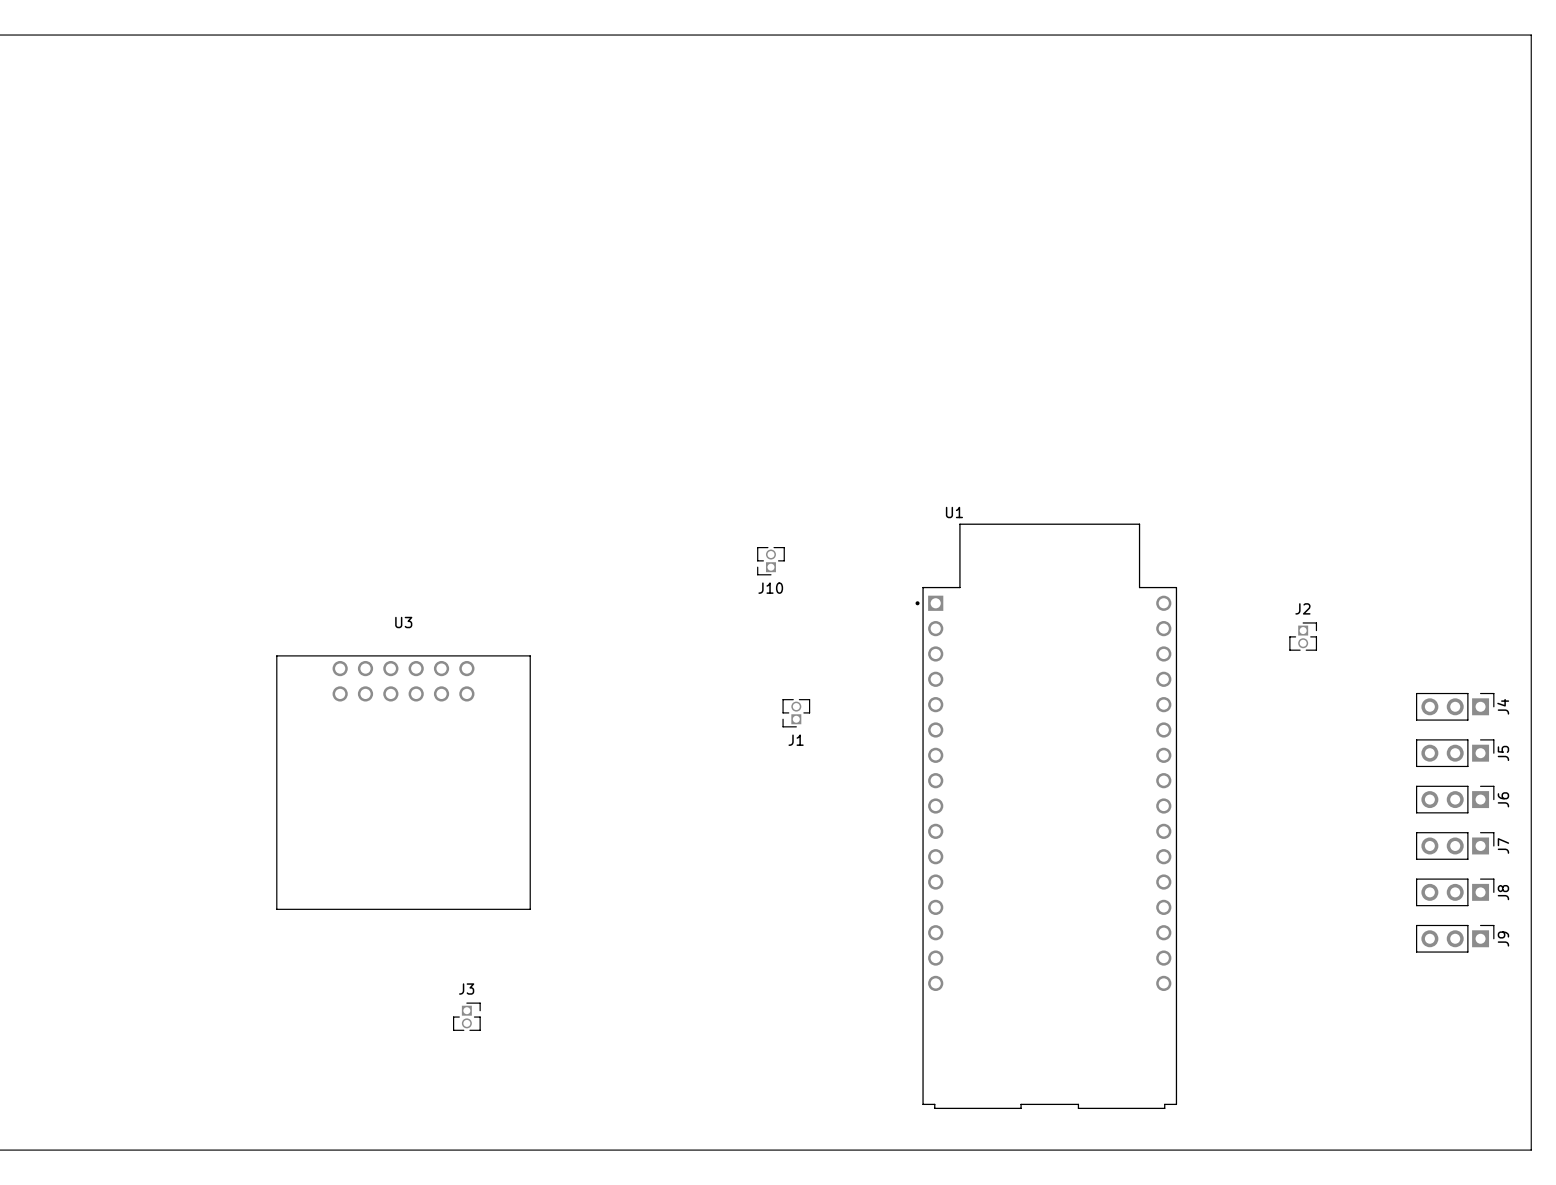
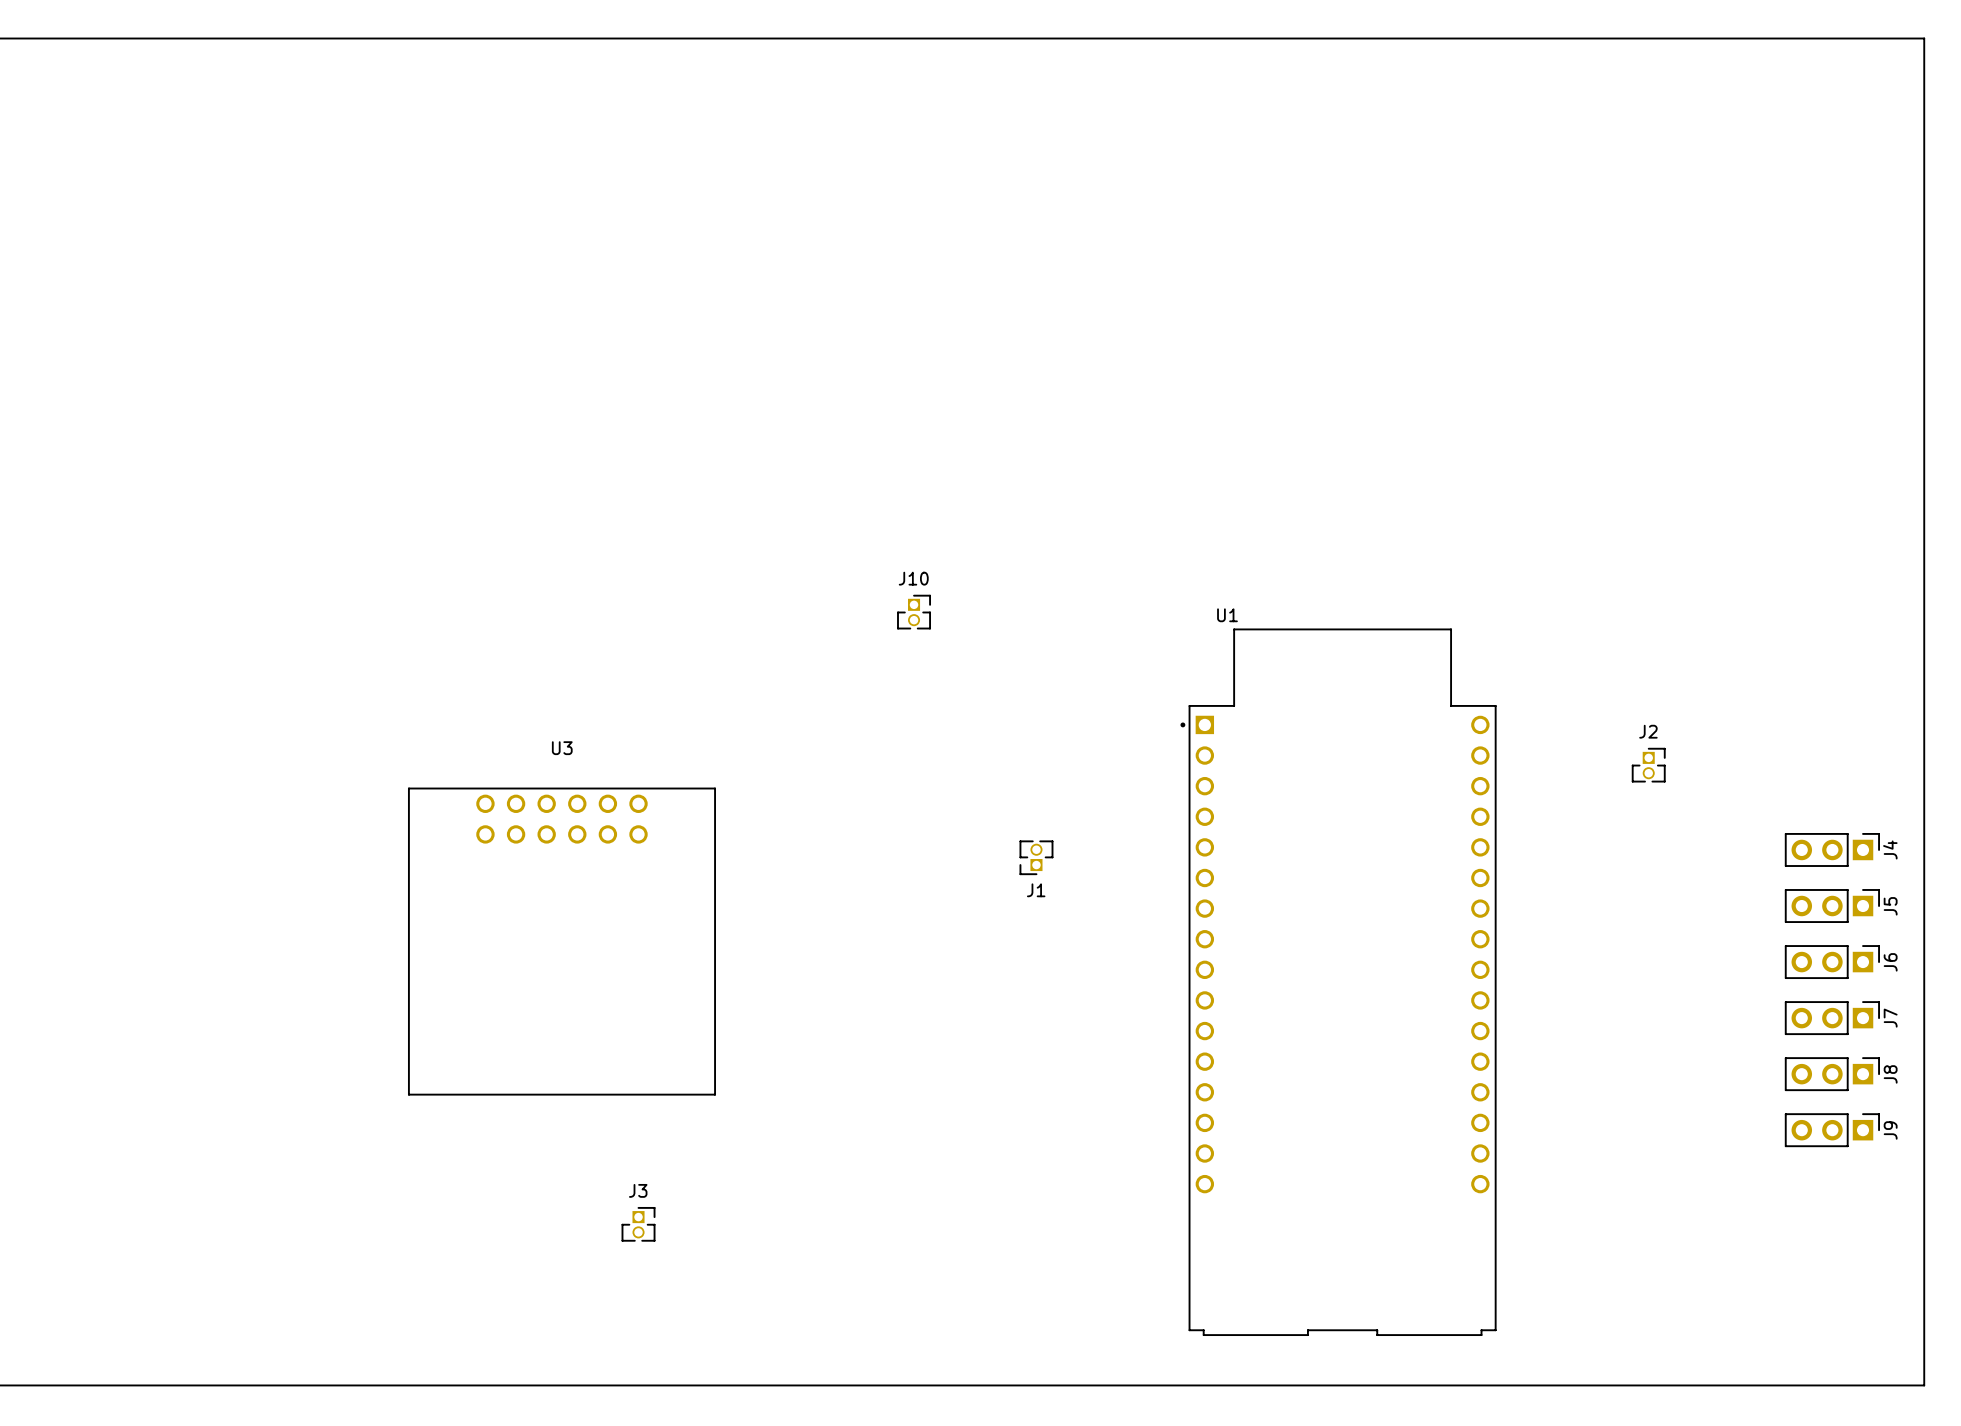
J10 rotation: 0° (770, 561) -> 180° (914, 612)
J10 position: (770, 561) -> (914, 612)

